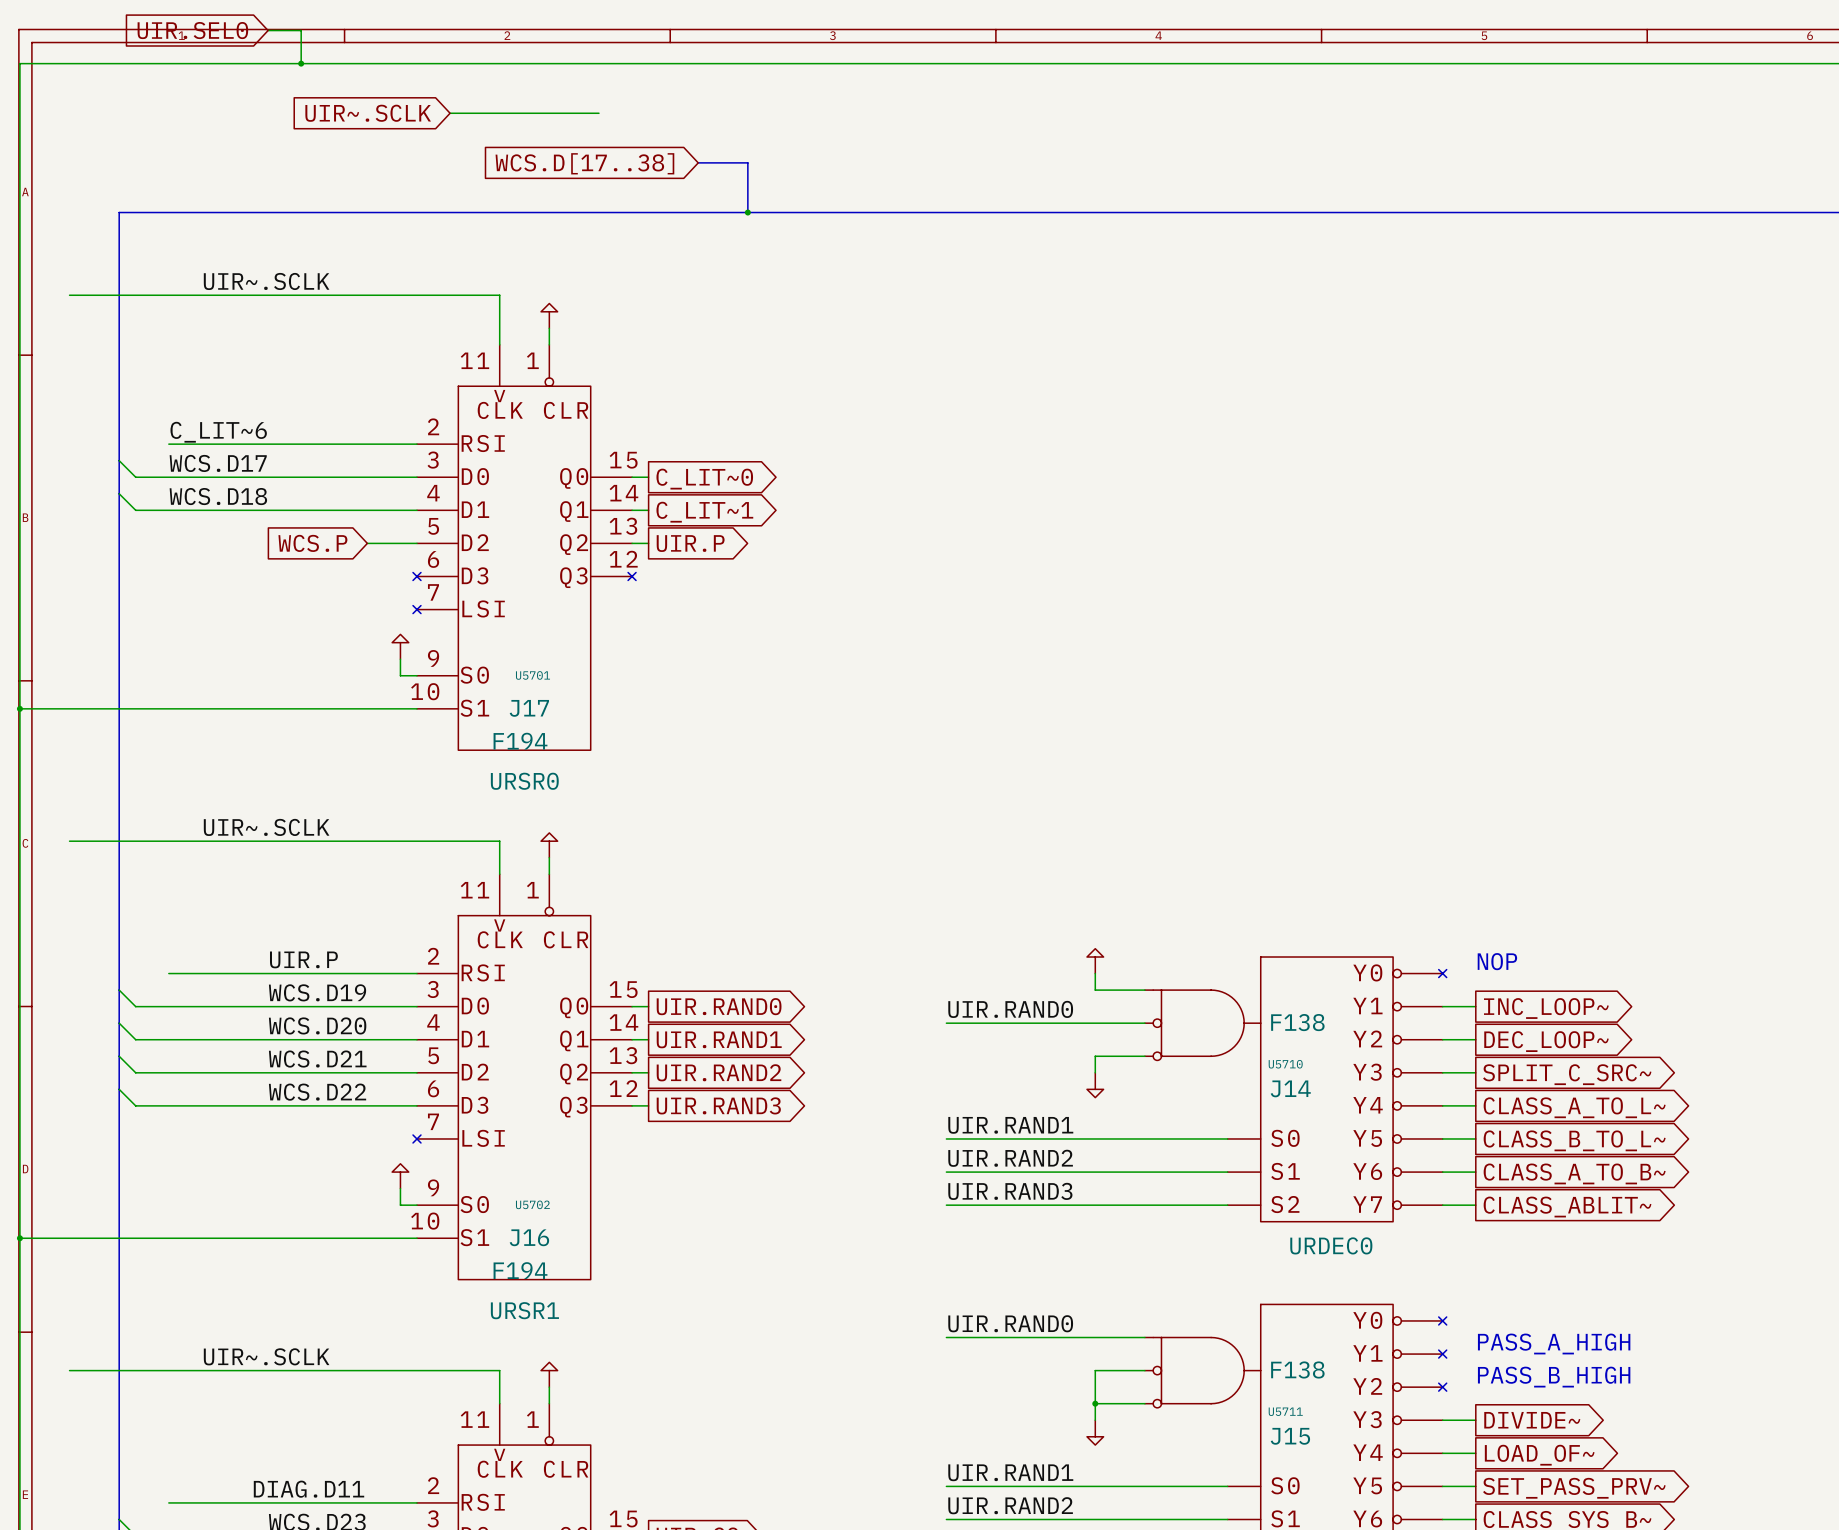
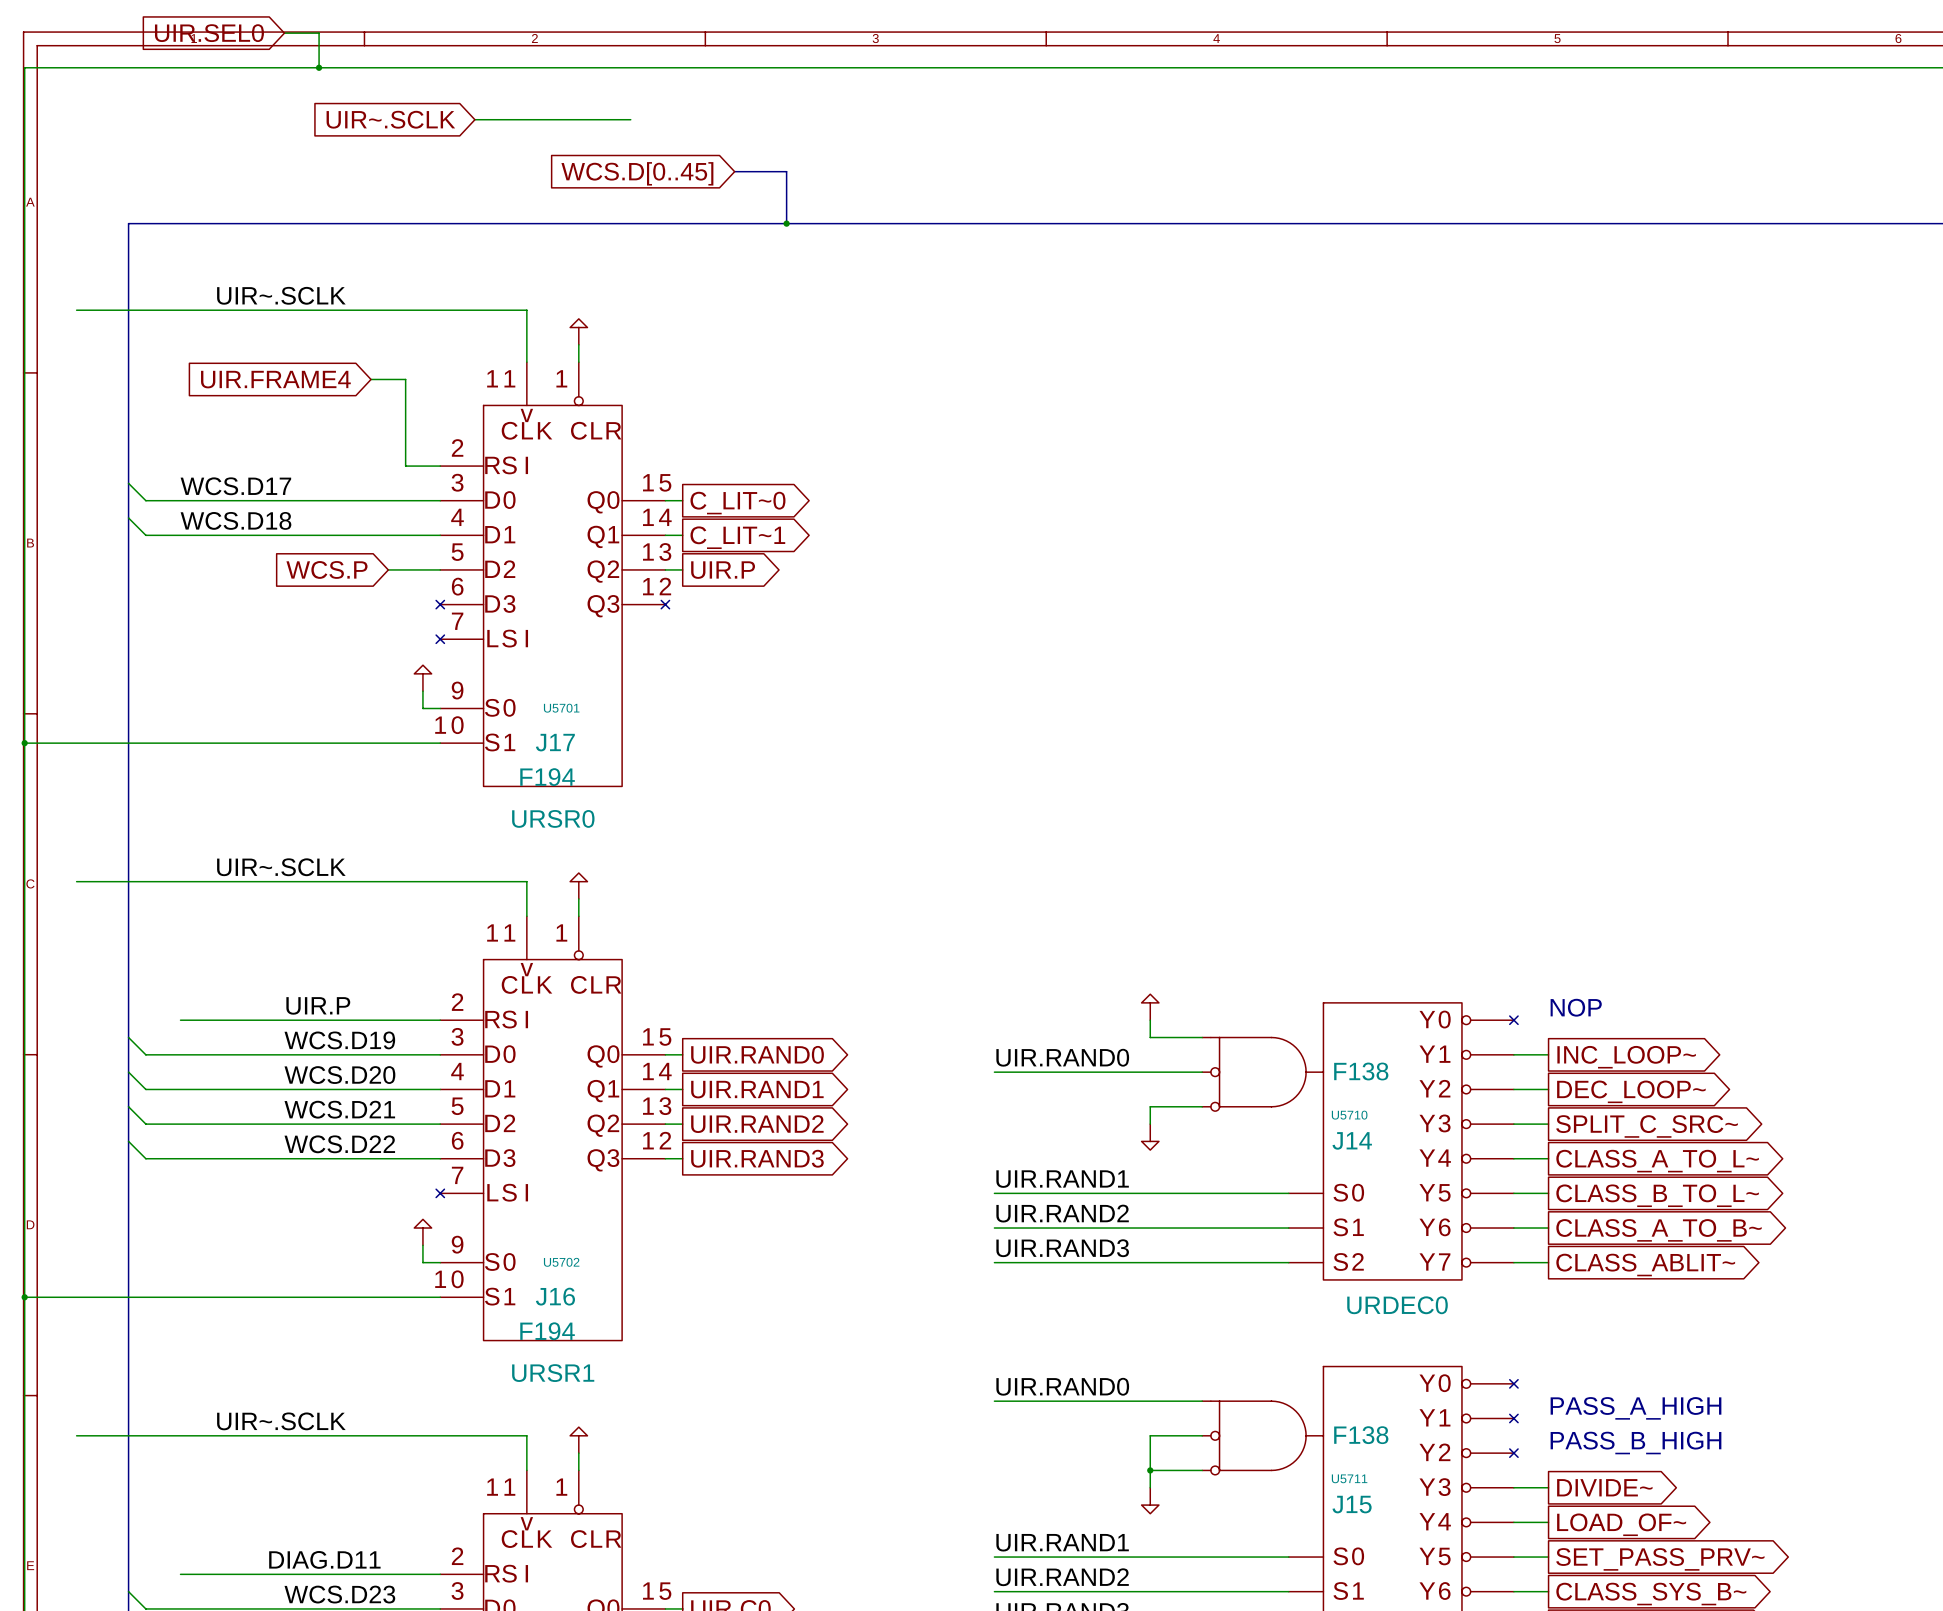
global label: WCS.D[17..38] (584, 163) -> WCS.D[0..45] (637, 173)
global label: none -> UIR.FRAME4 (275, 379)
label: C_LIT~6 (218, 432) -> none
wire: (168, 444) (383, 444) -> (371, 379) (405, 379) (405, 466)

